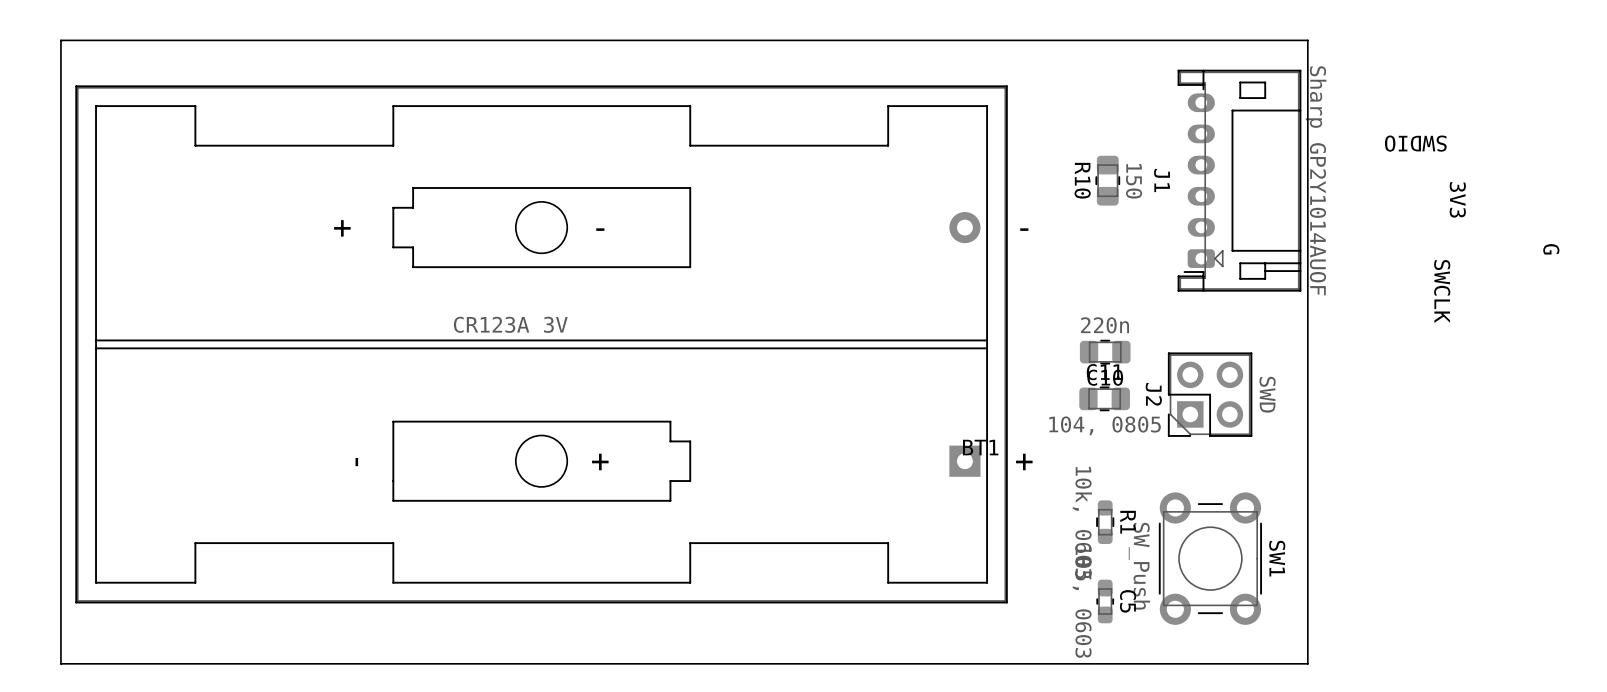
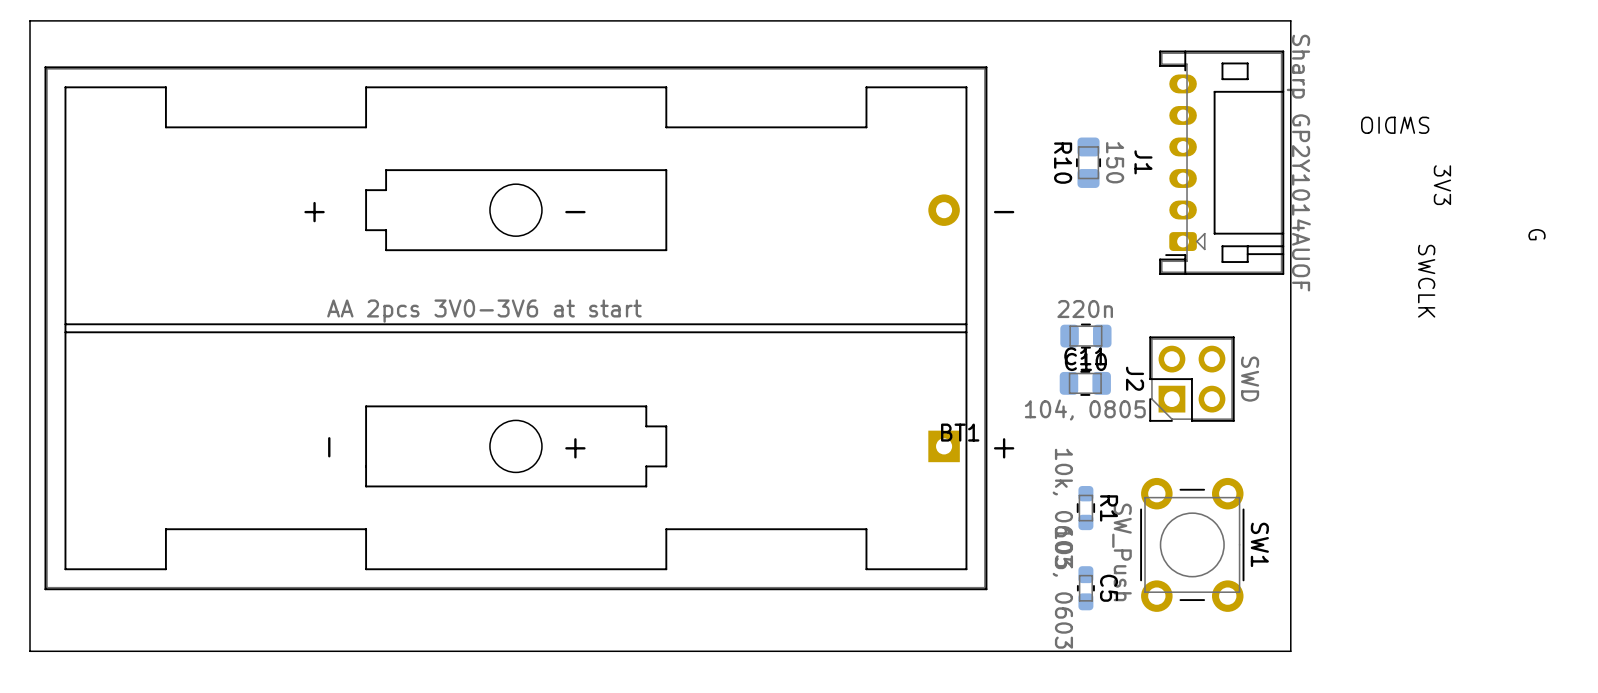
BT1 value: CR123A 3V (510, 324) -> AA 2pcs 3V0-3V6 at start (484, 311)

